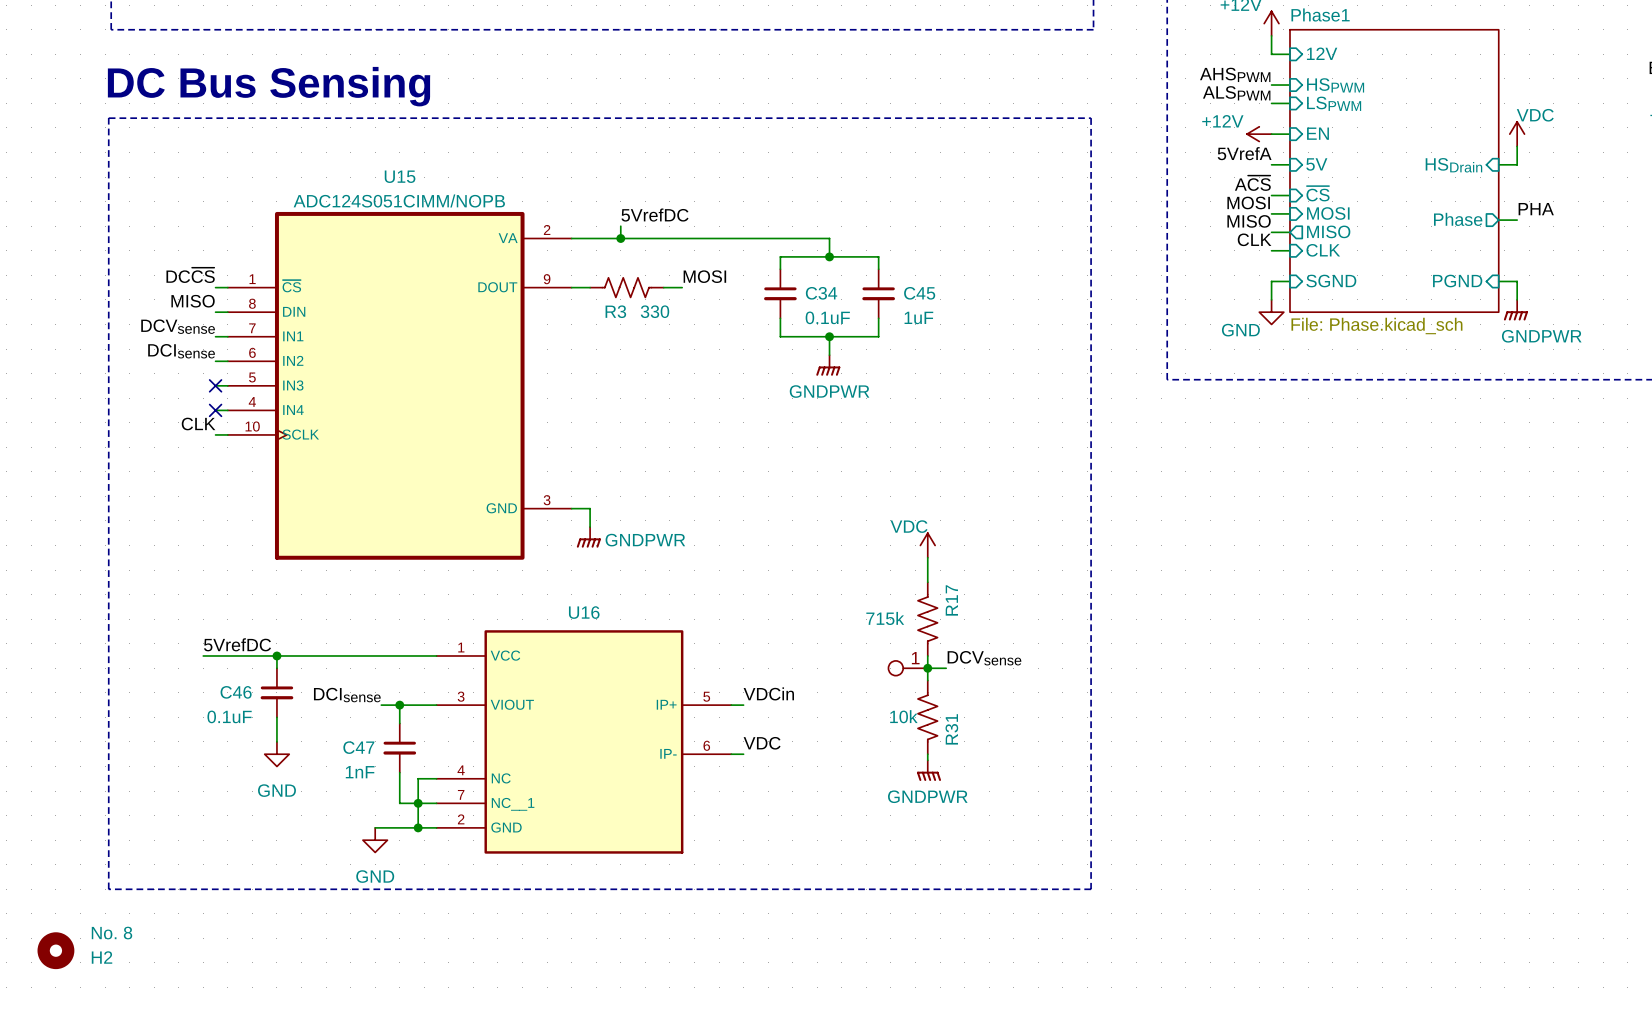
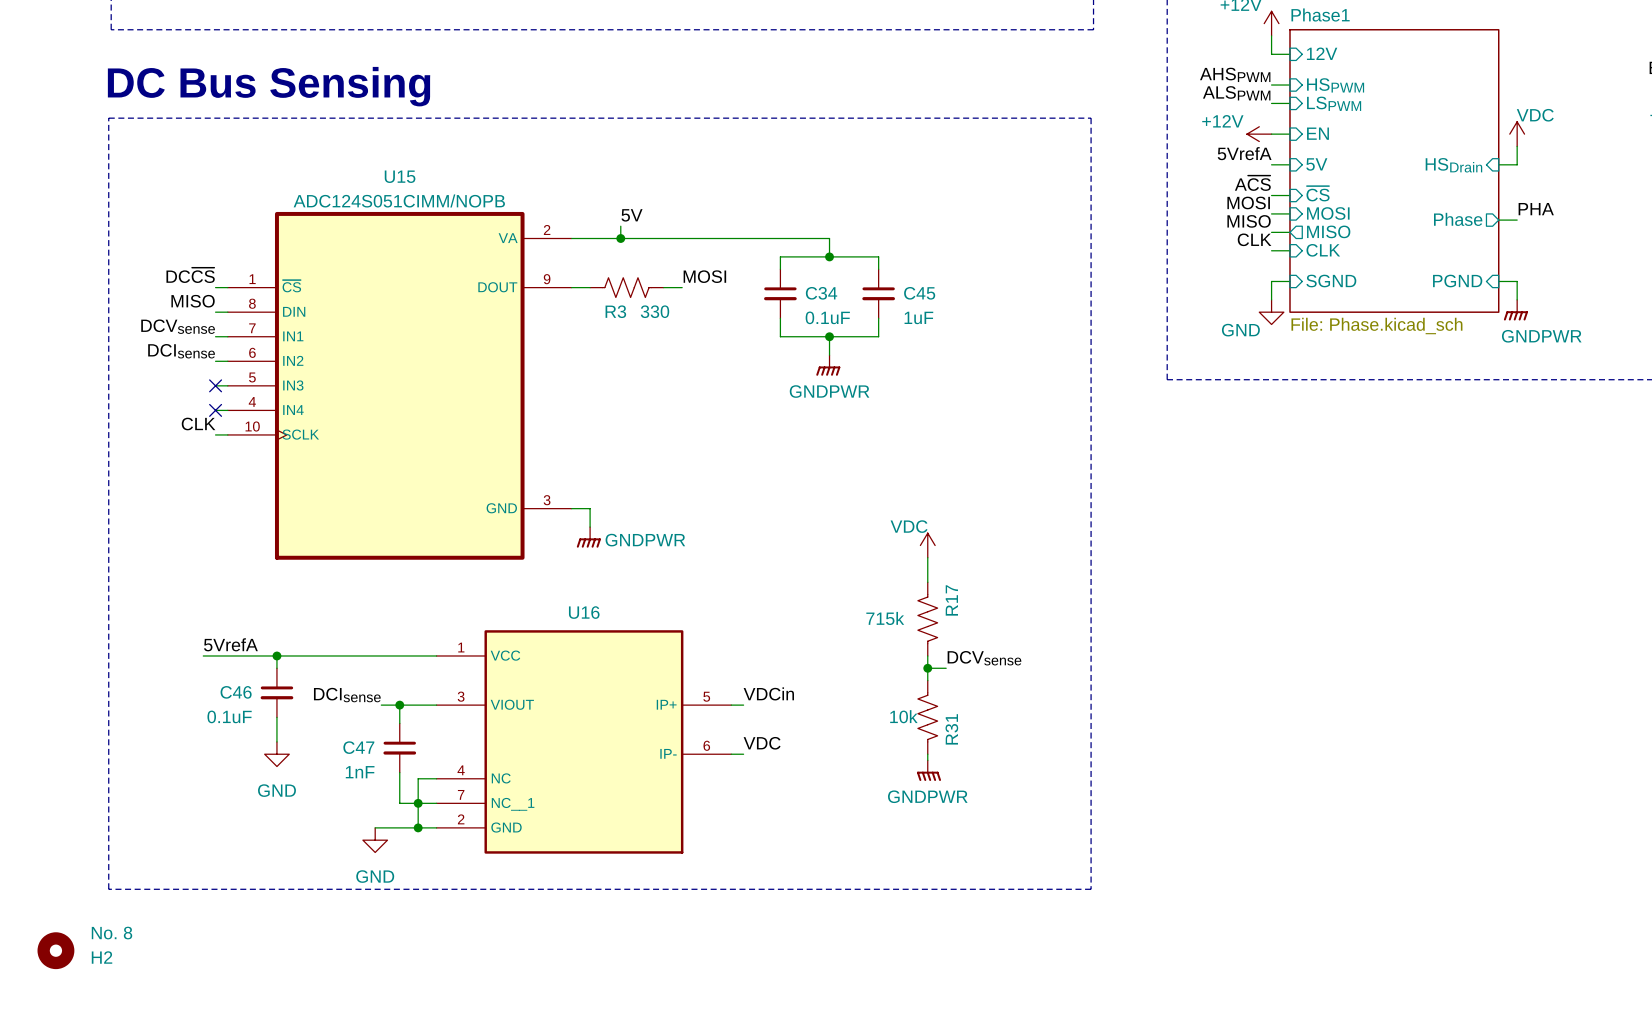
label: 5VrefDC (655, 215) -> 5V (632, 215)
label: 5VrefDC (237, 644) -> 5VrefA (230, 644)
part: (908, 668) -> none

